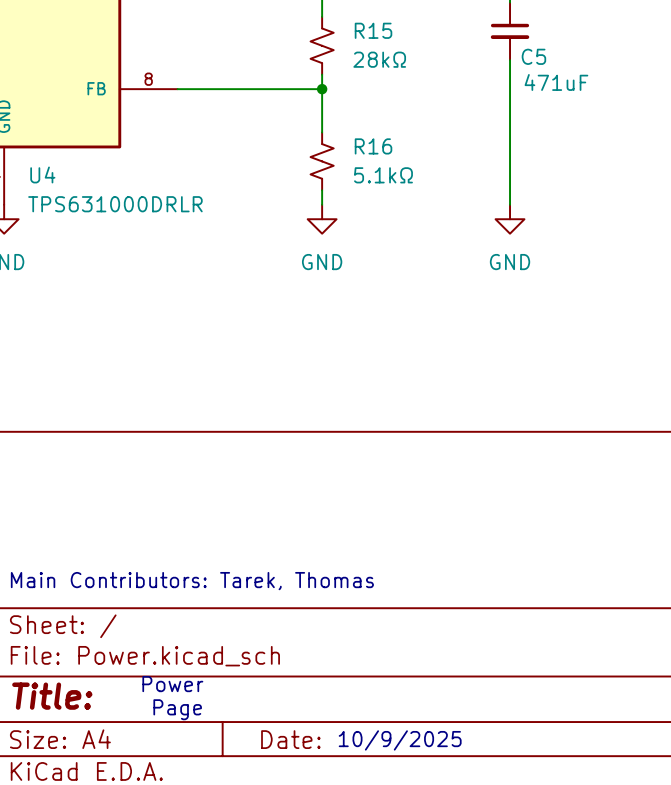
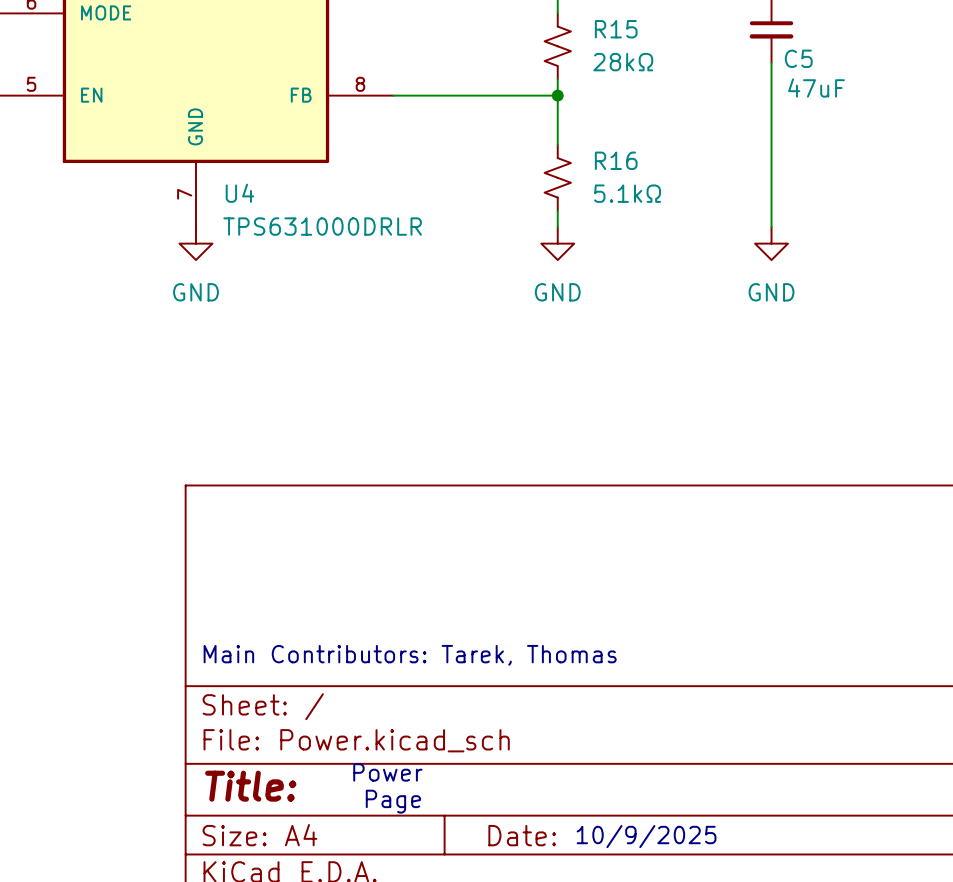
C5 value: 471uF (556, 82) -> 47uF (816, 88)

